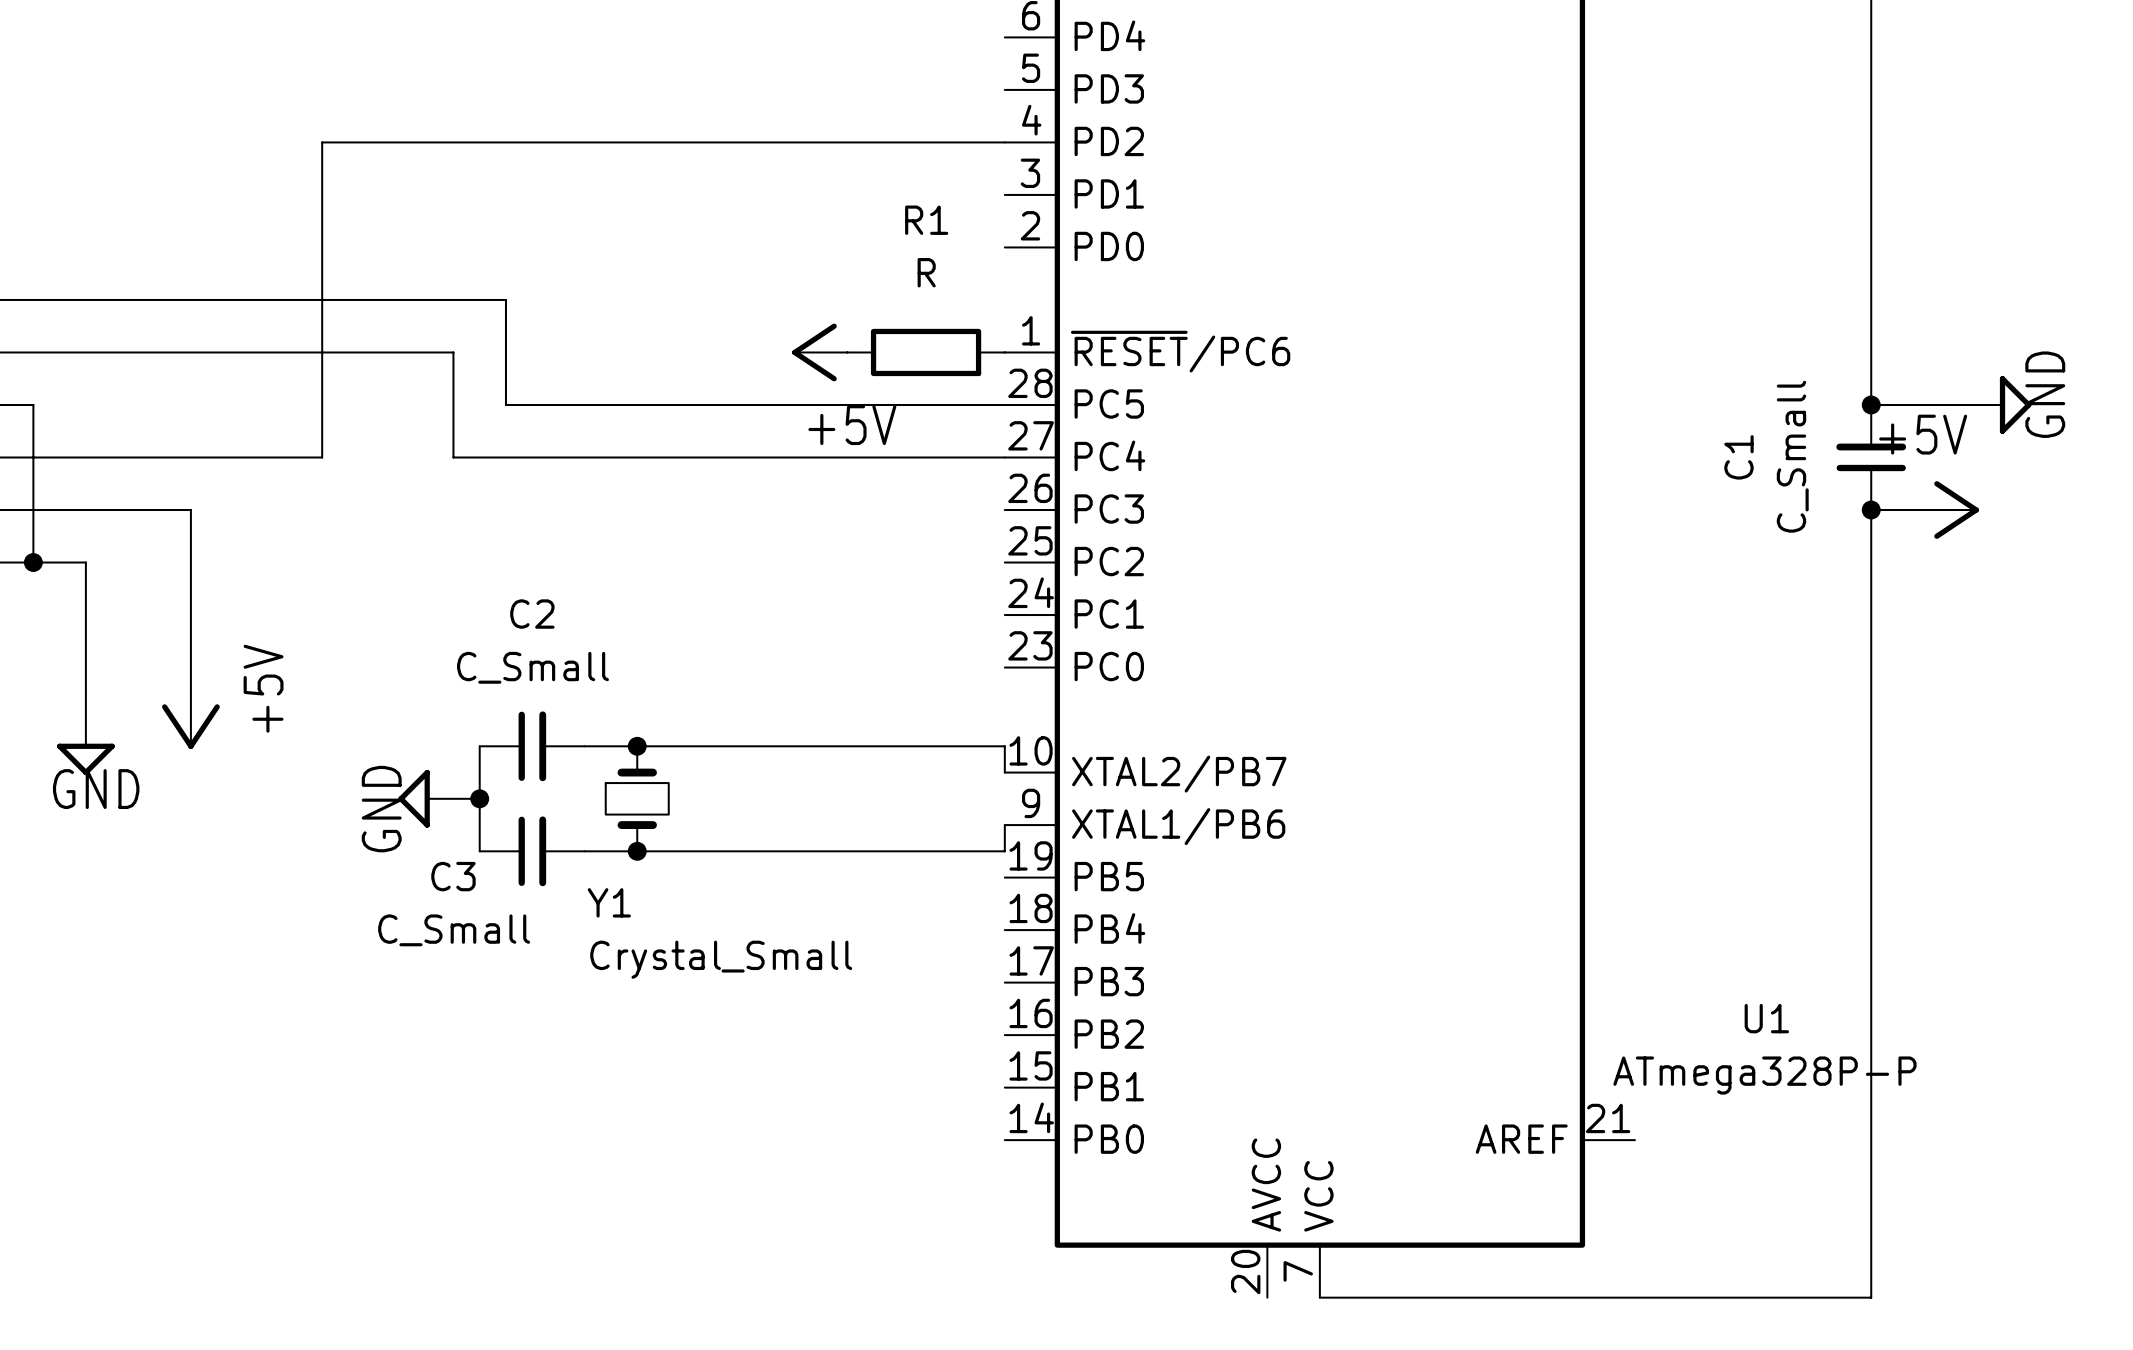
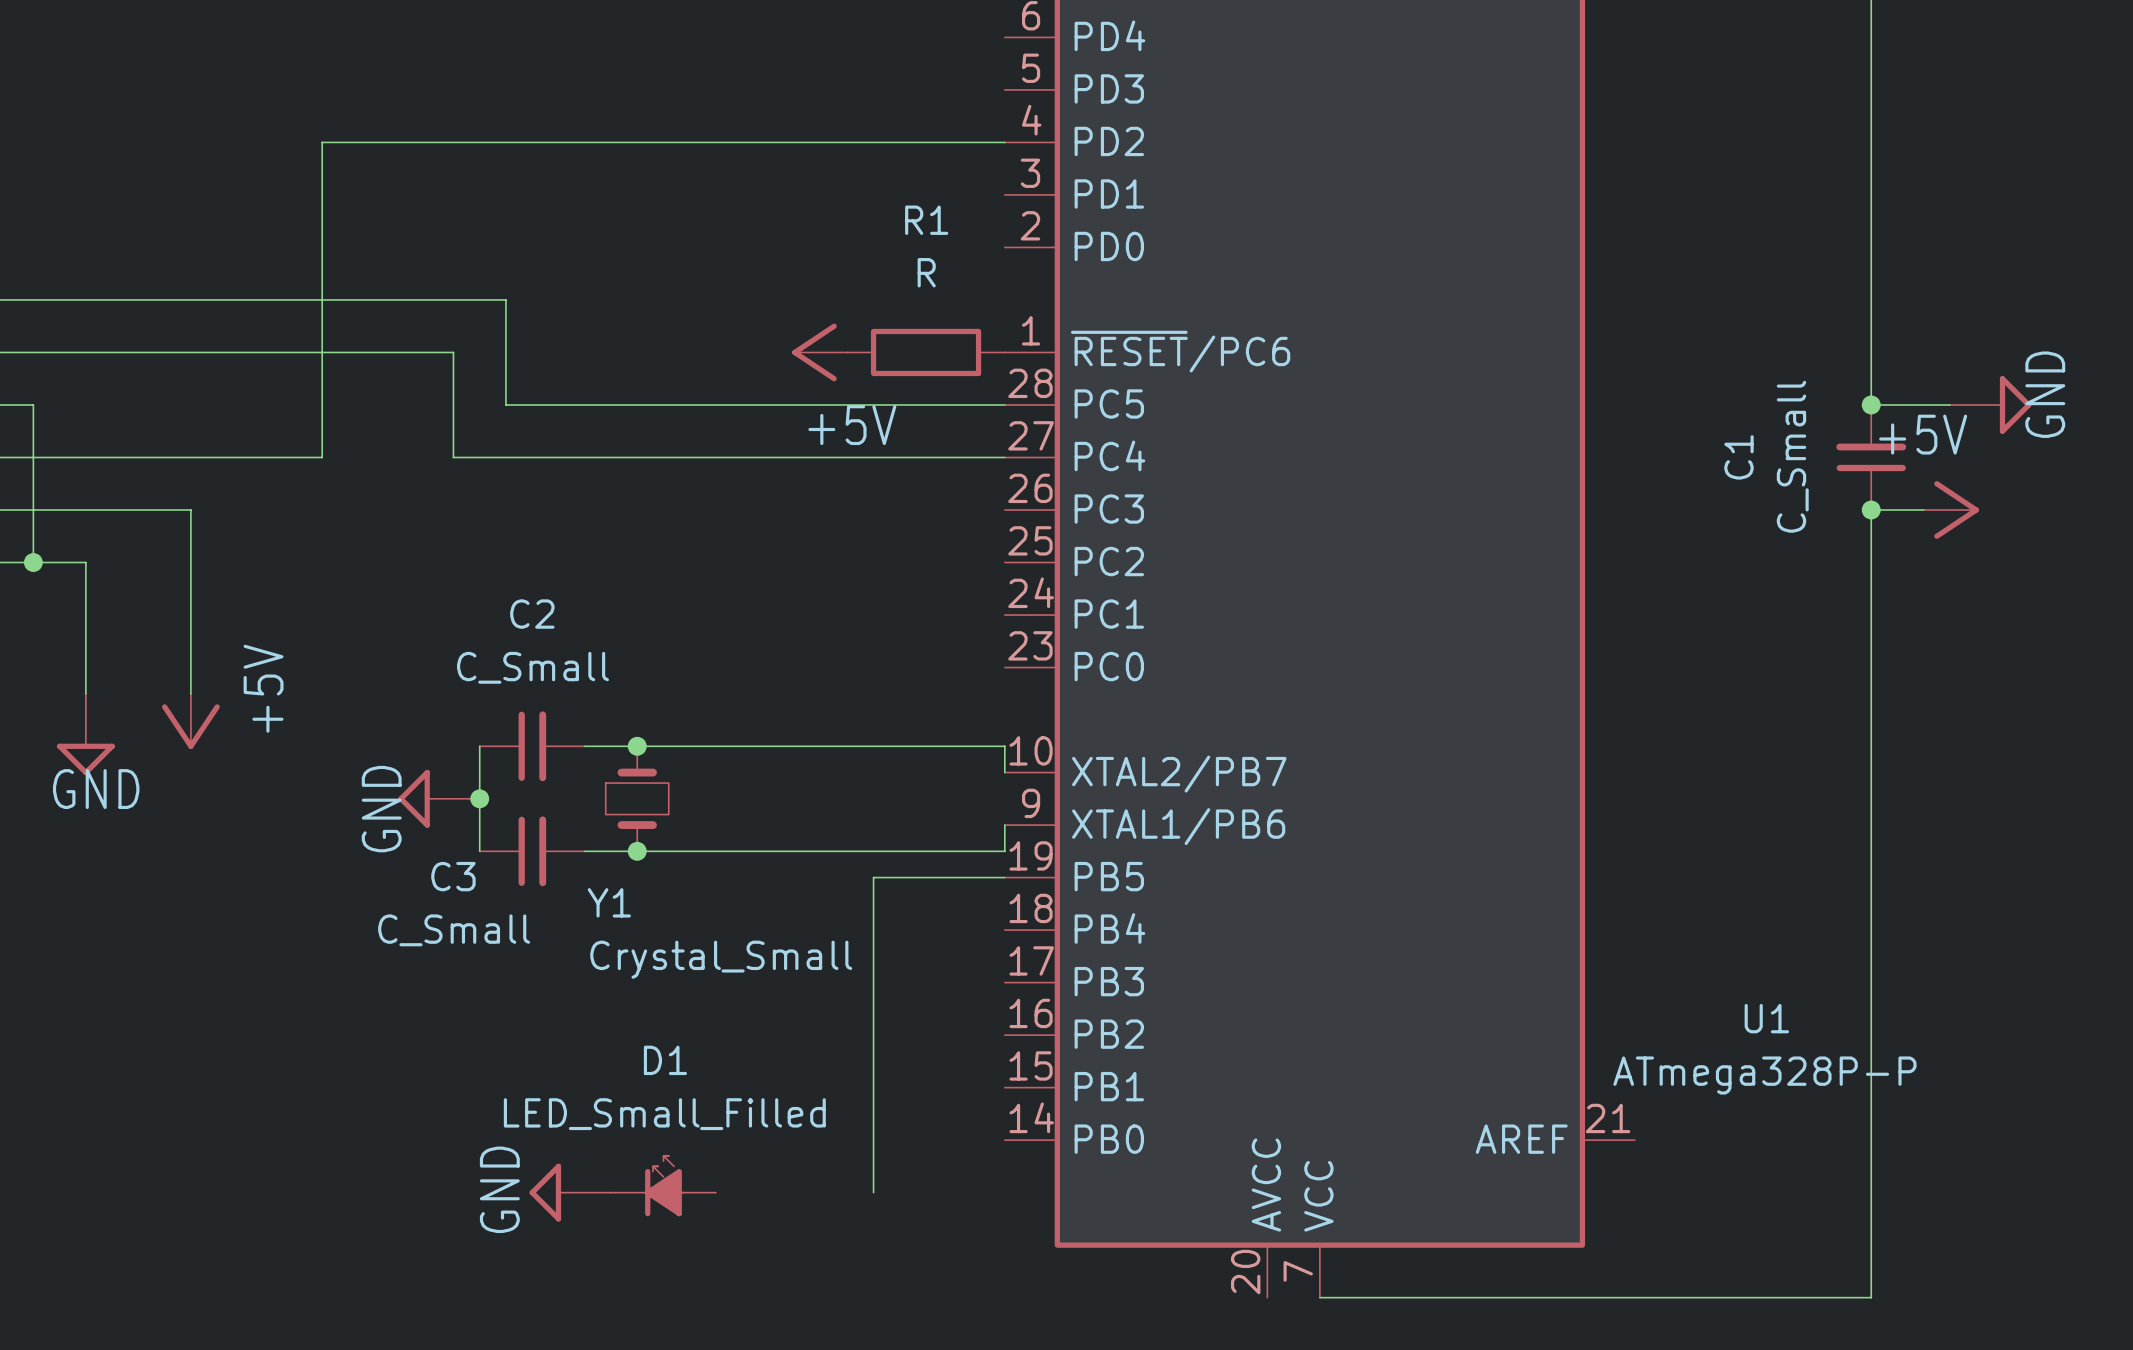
wire: none -> (1004, 877) (873, 877) (873, 1192)
D1: none -> LED_Small_Filled (663, 1186)
power symbol: none -> GND (570, 1192)

